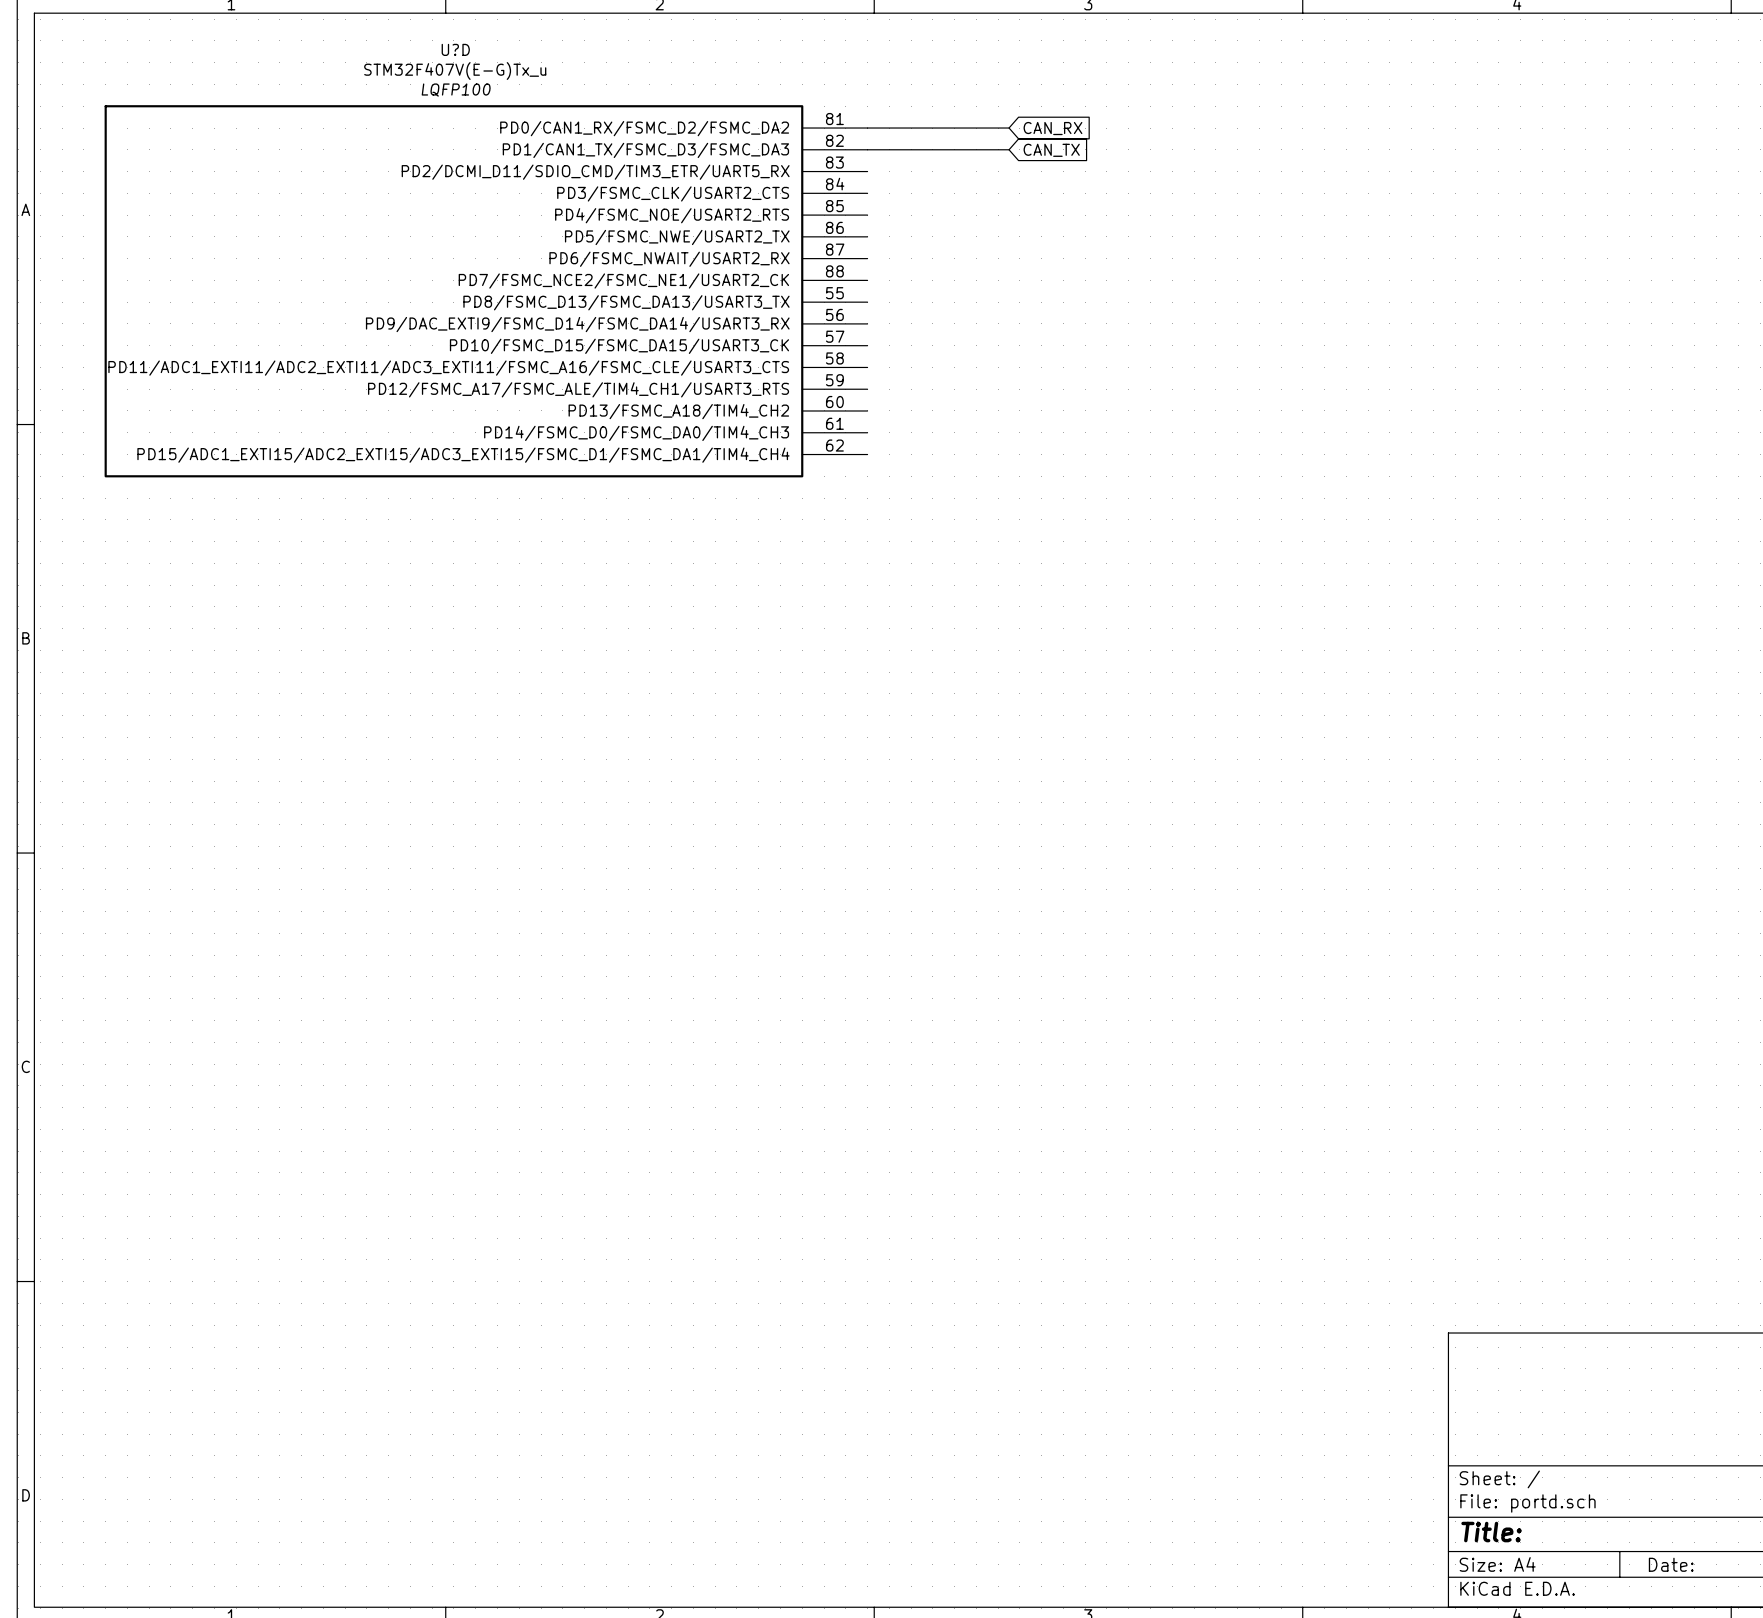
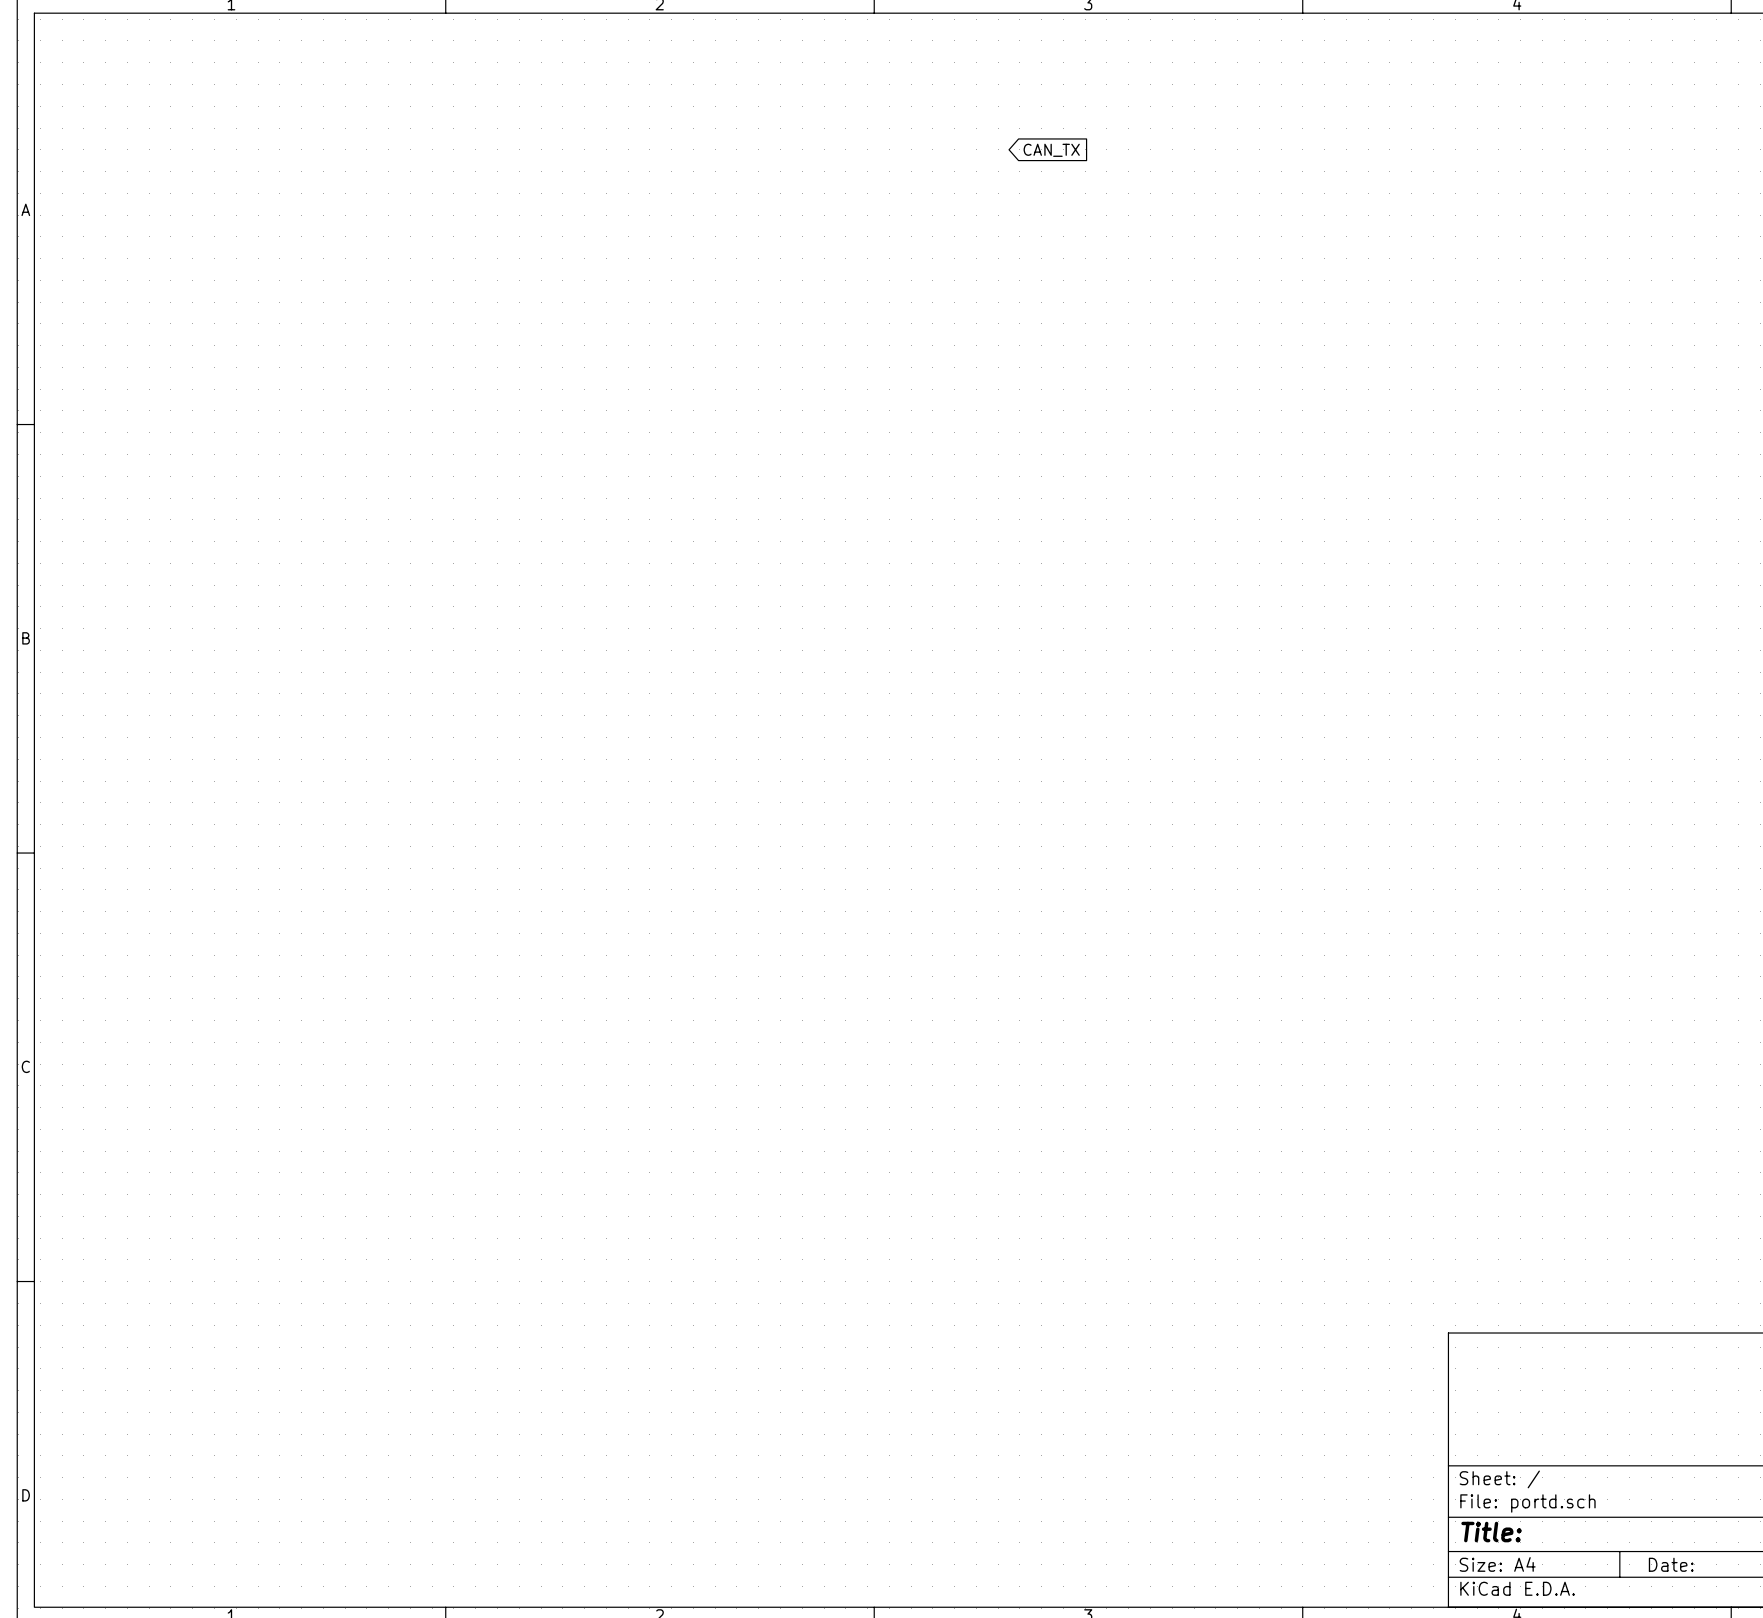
wire: (867, 128) (1009, 128) -> none
global label: CAN_RX (1052, 128) -> none
wire: (867, 149) (1009, 149) -> none
U?D: STM32F407V(E-G)Tx_u (486, 291) -> none

